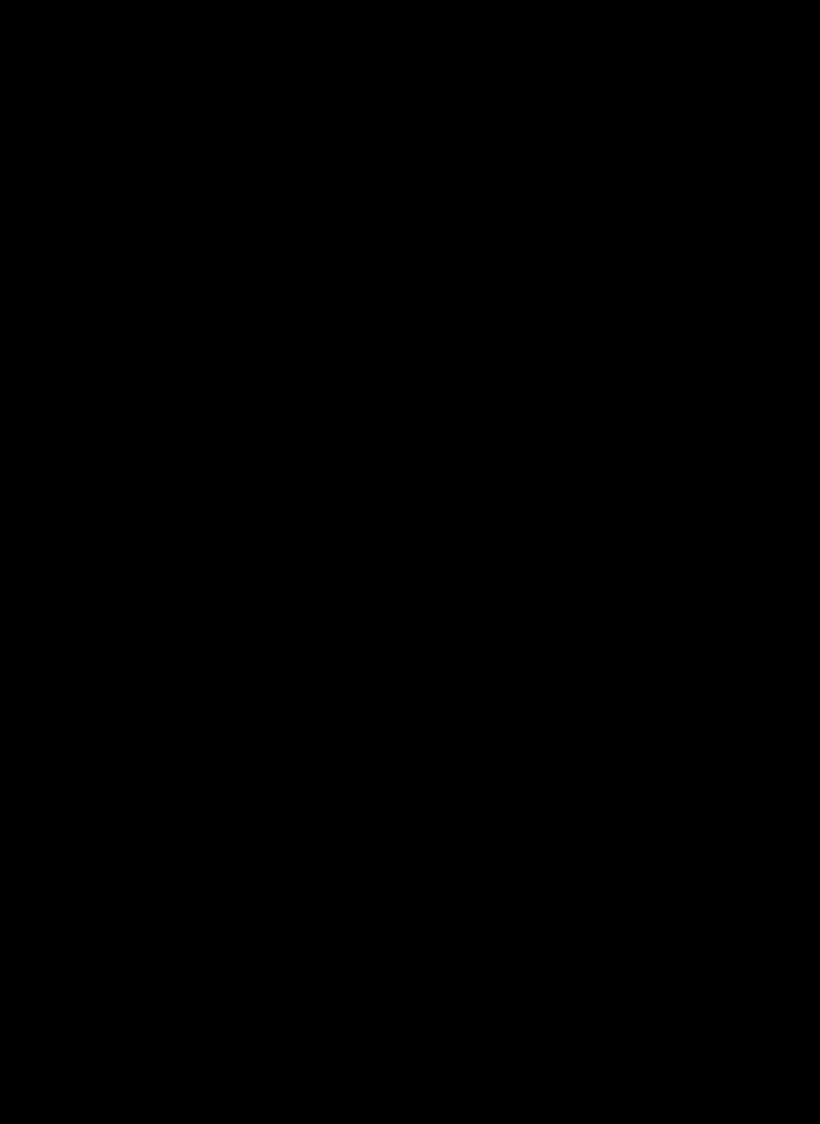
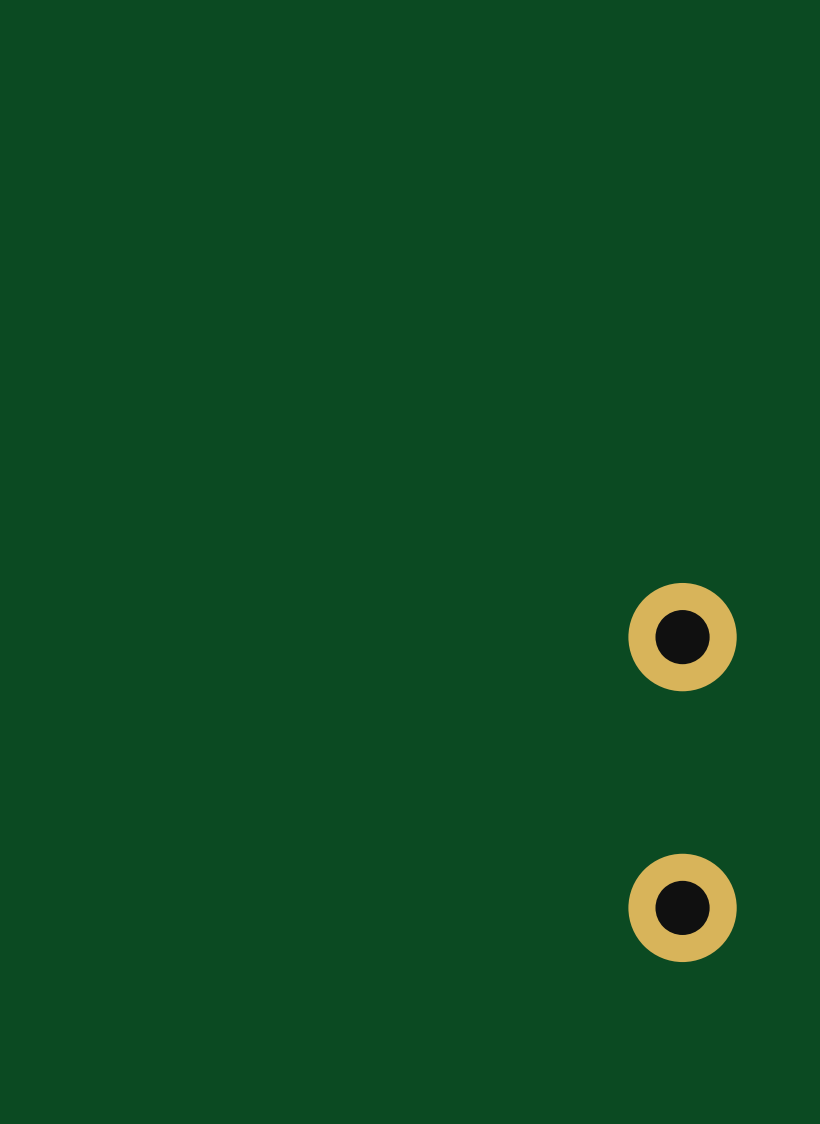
part: none -> (682, 772)

